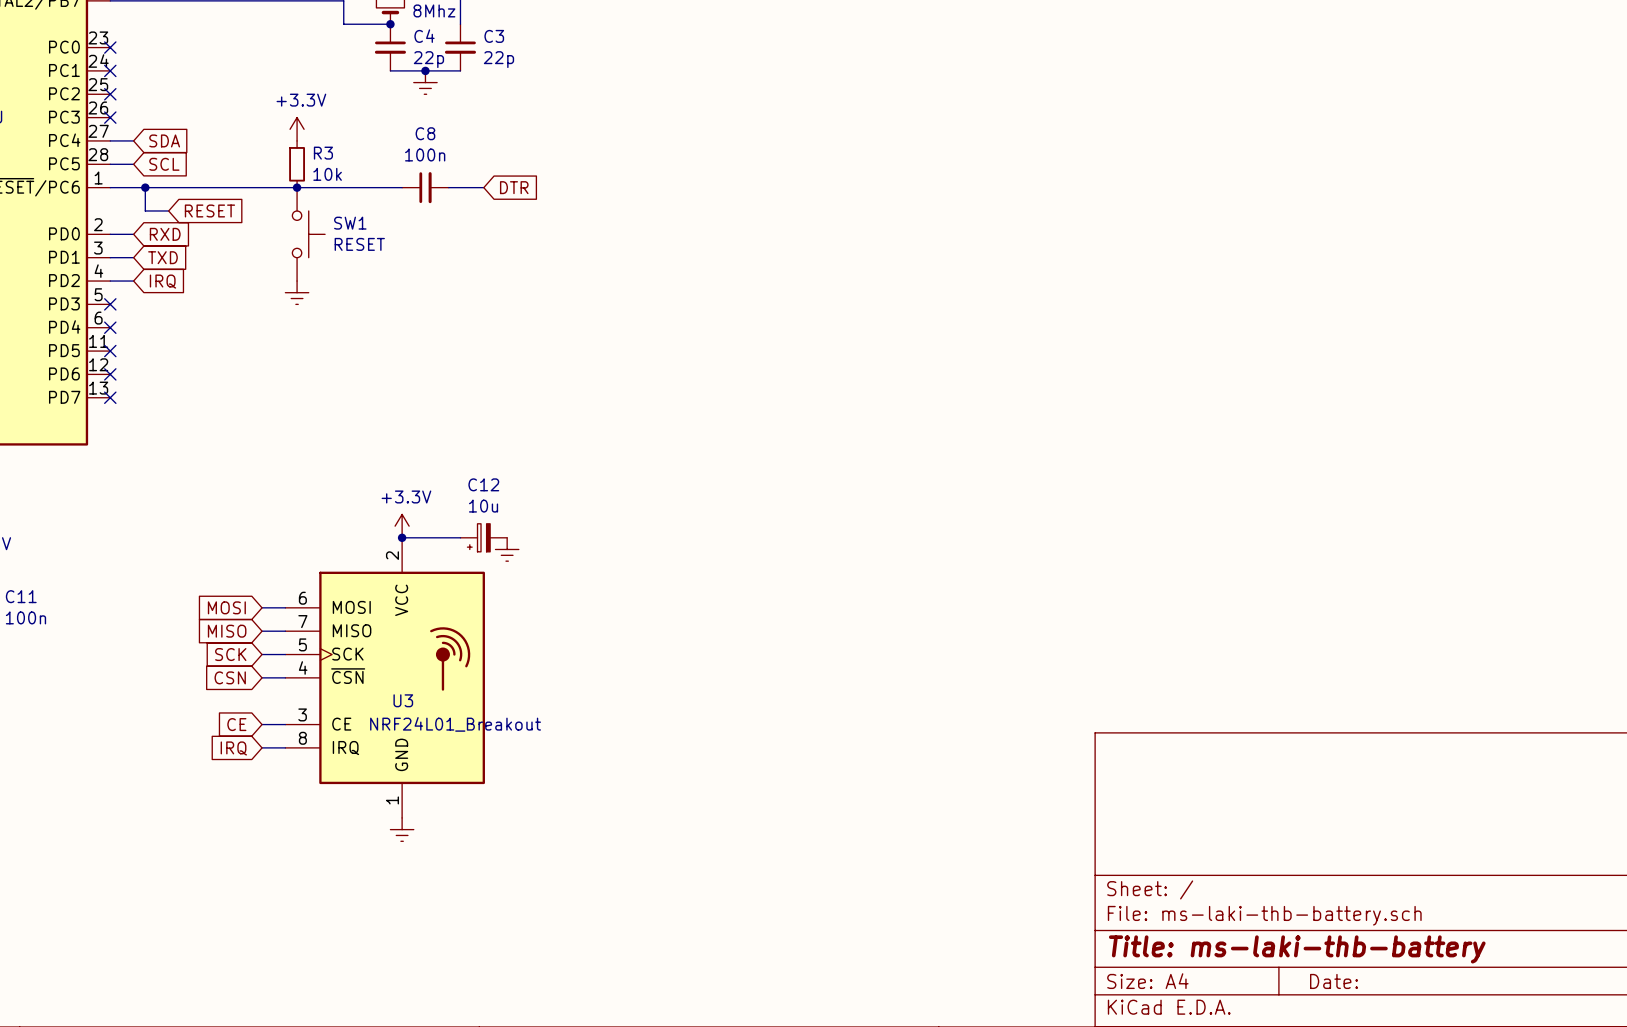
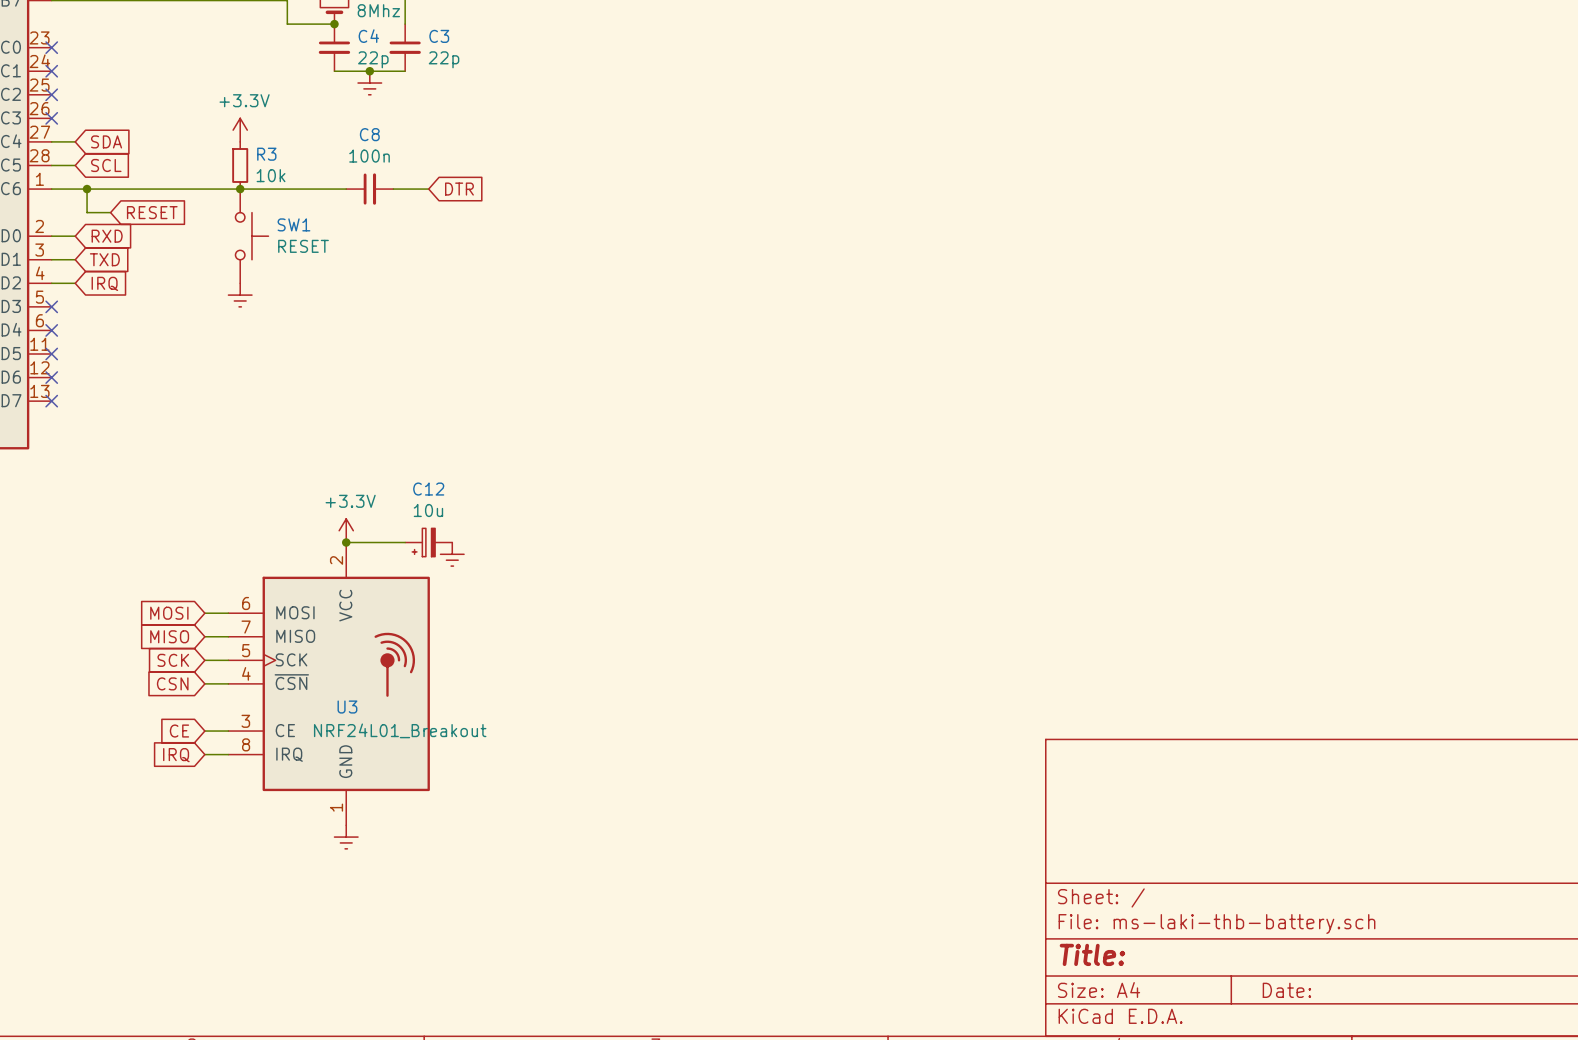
title block: Title: ms-laki-thb-battery (1297, 949) -> Title: (1092, 954)

